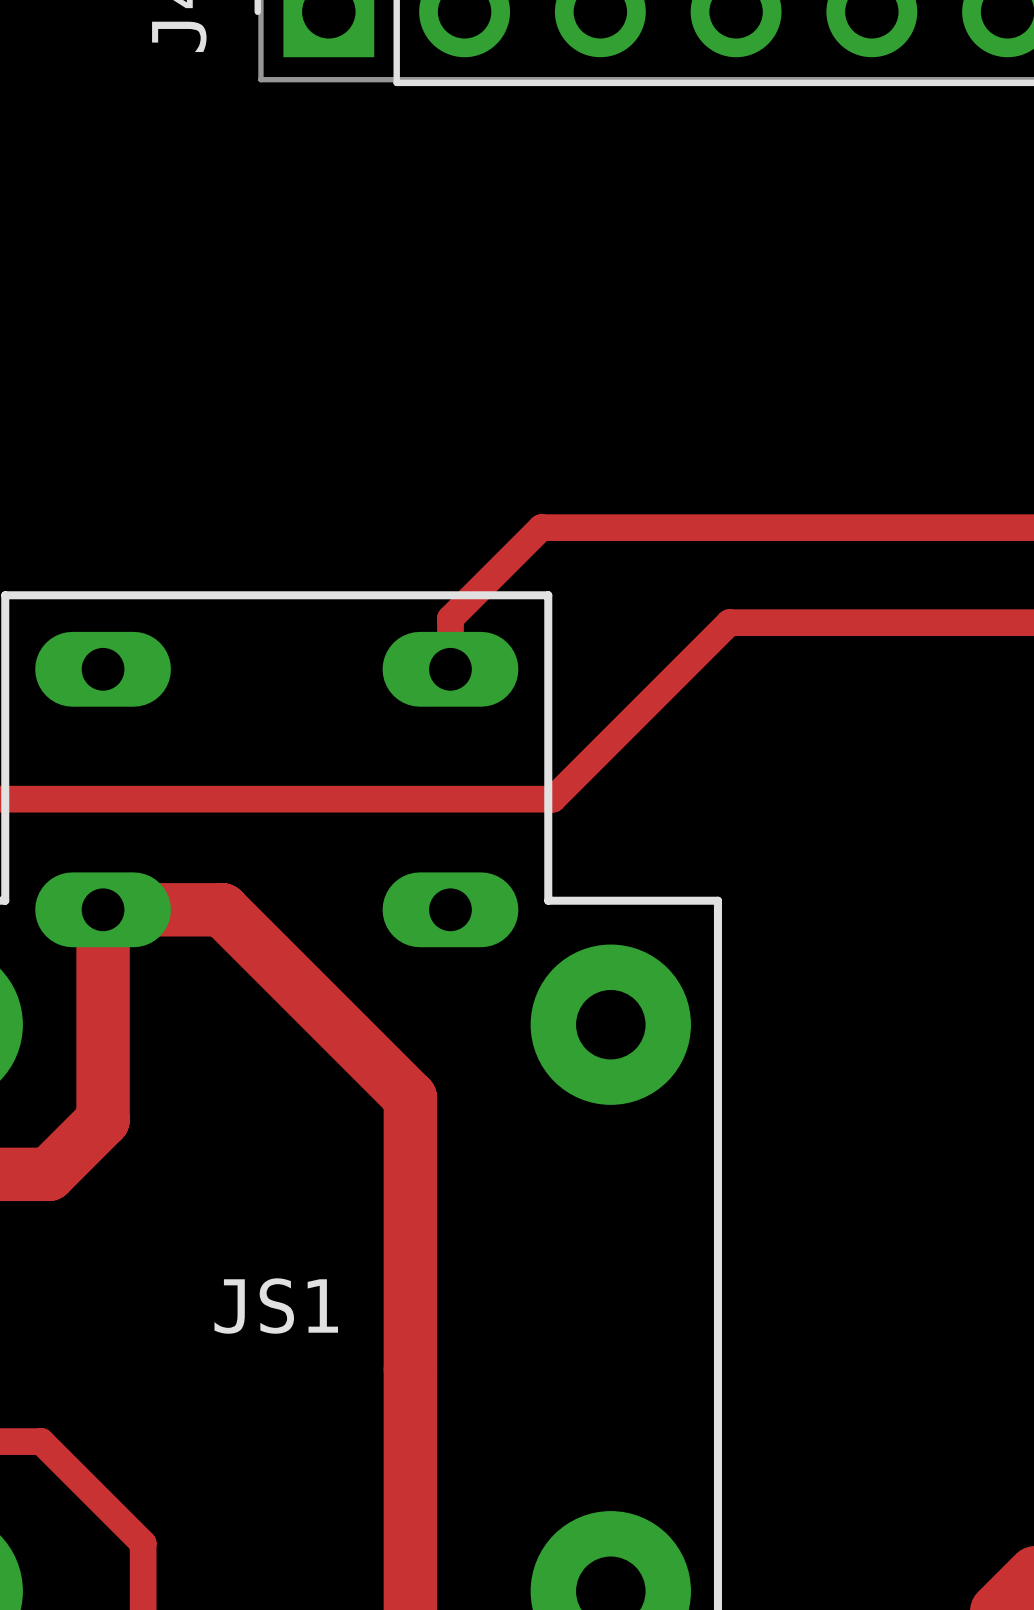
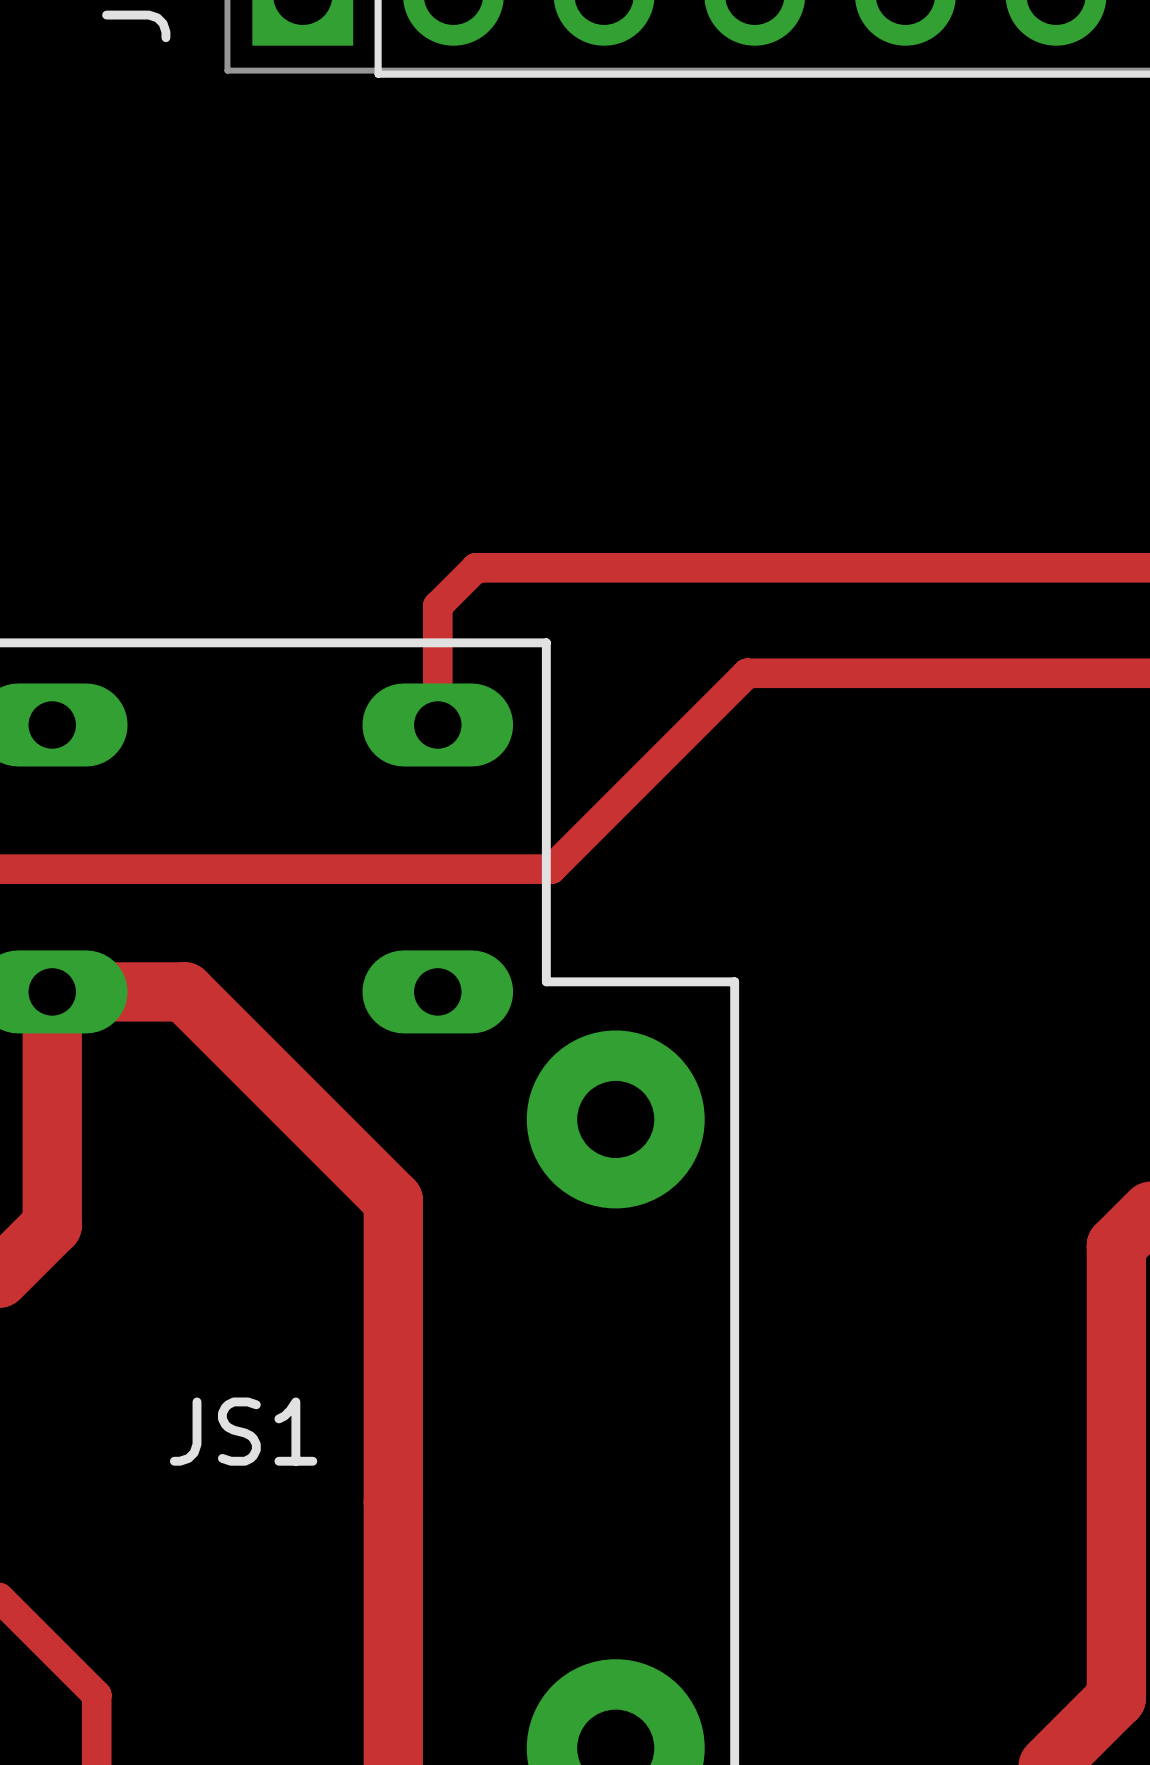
track: (541, 527) (450, 618) -> (538, 567) (476, 567) (437, 606) (437, 668)

